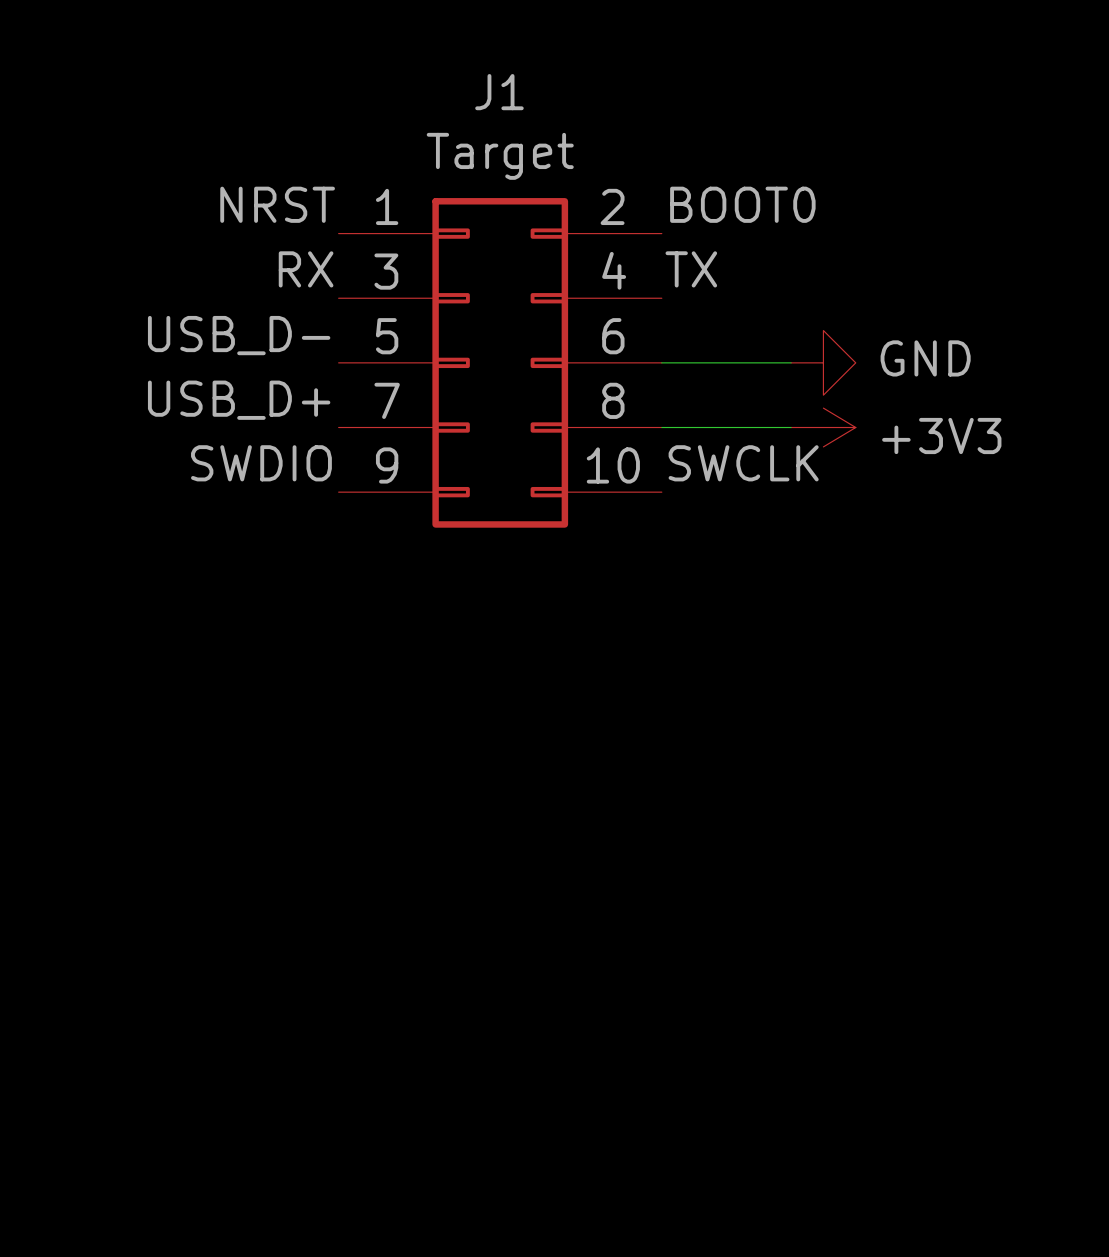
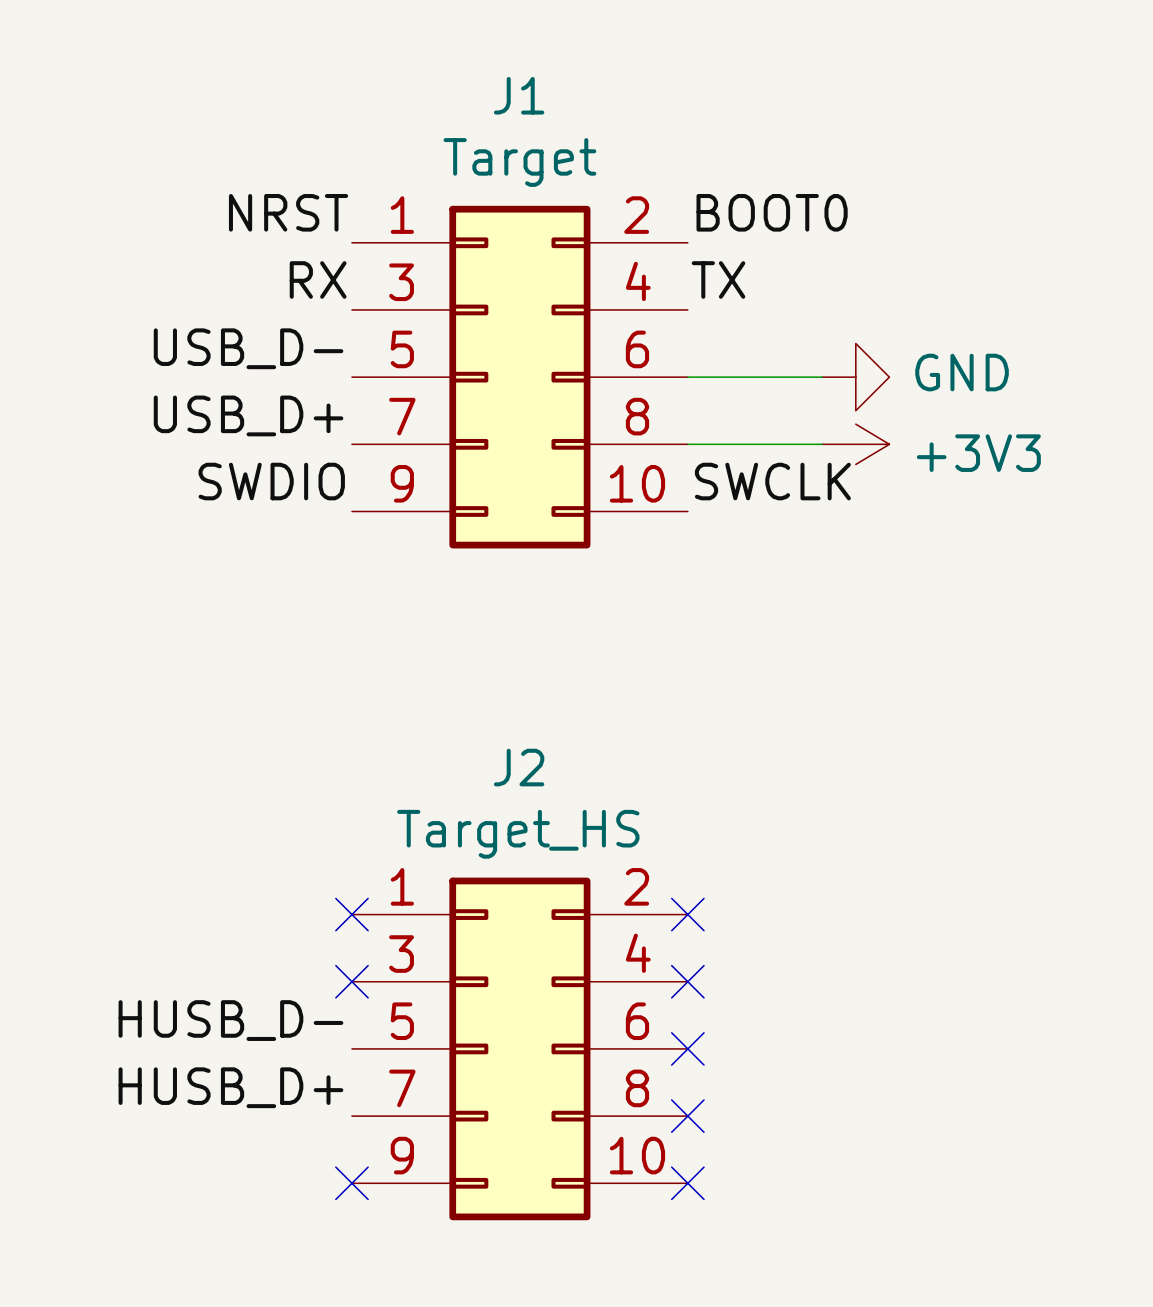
no-connect mark: none -> (351, 914)
no-connect mark: none -> (687, 914)
no-connect mark: none -> (351, 981)
no-connect mark: none -> (687, 981)
label: none -> HUSB_D- (230, 1020)
J2: none -> Target_HS (519, 1048)
no-connect mark: none -> (687, 1048)
label: none -> HUSB_D+ (230, 1087)
no-connect mark: none -> (687, 1116)
no-connect mark: none -> (351, 1183)
no-connect mark: none -> (687, 1183)

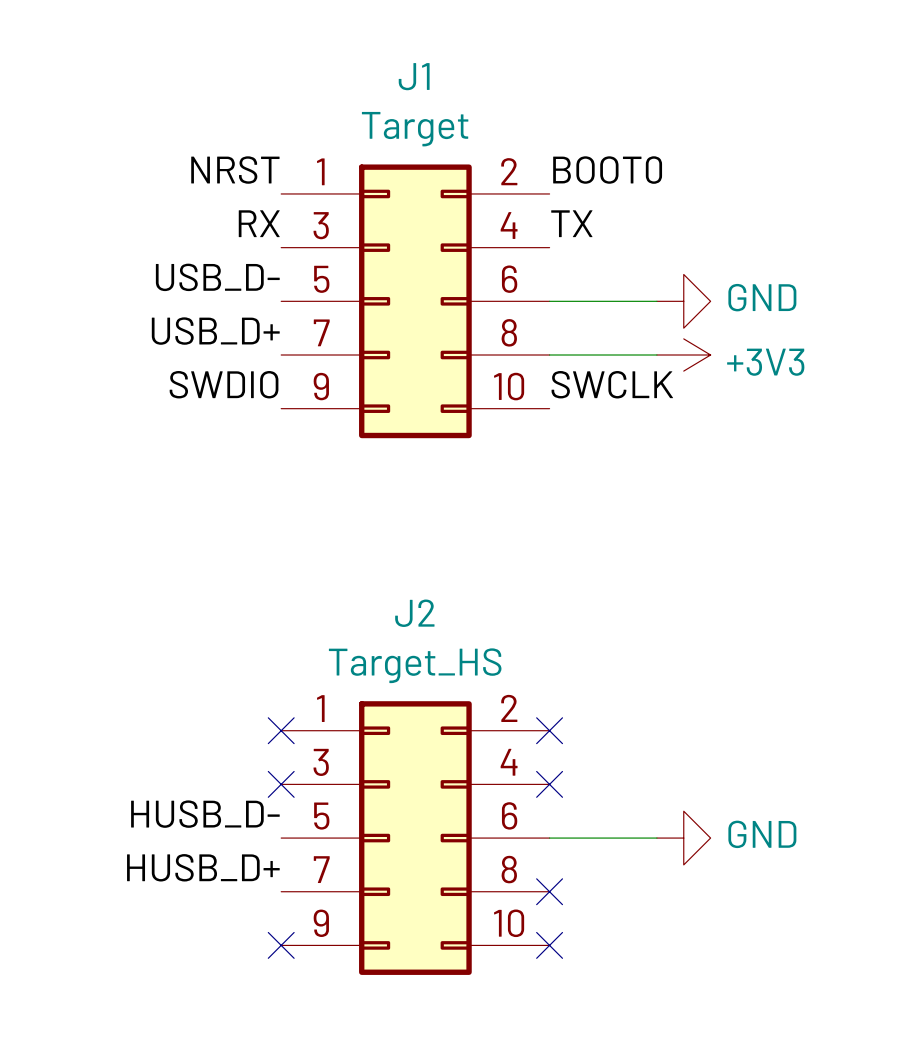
wire: none -> (549, 838) (656, 838)
no-connect mark: (687, 1048) -> none
power symbol: none -> GND (683, 838)

